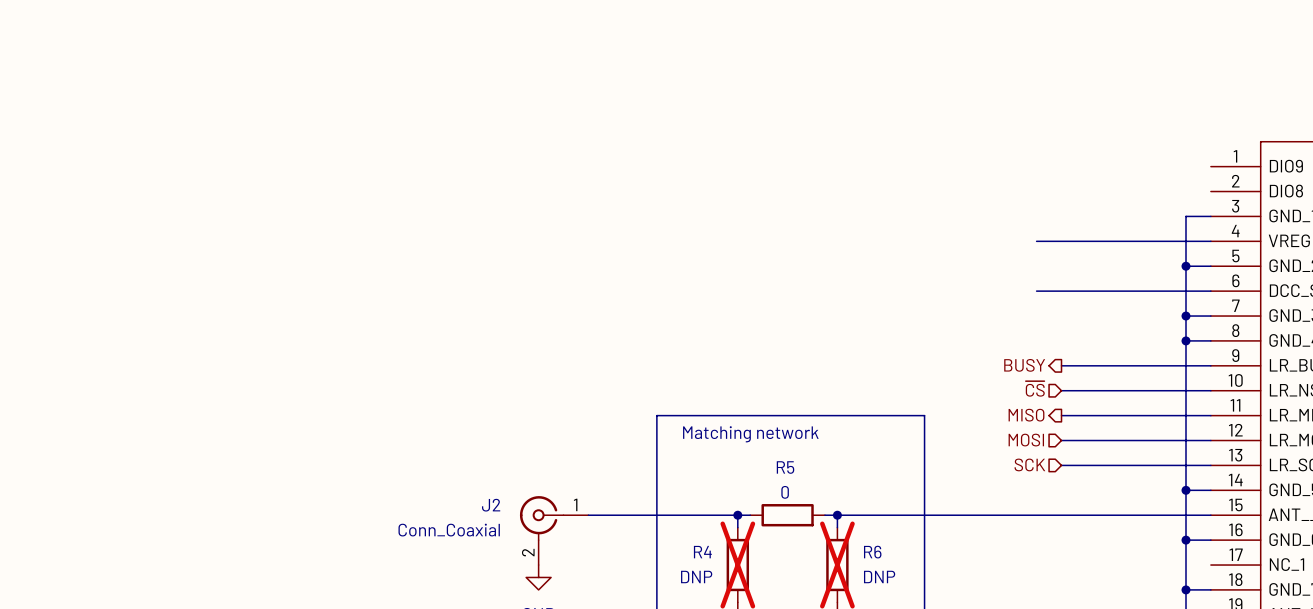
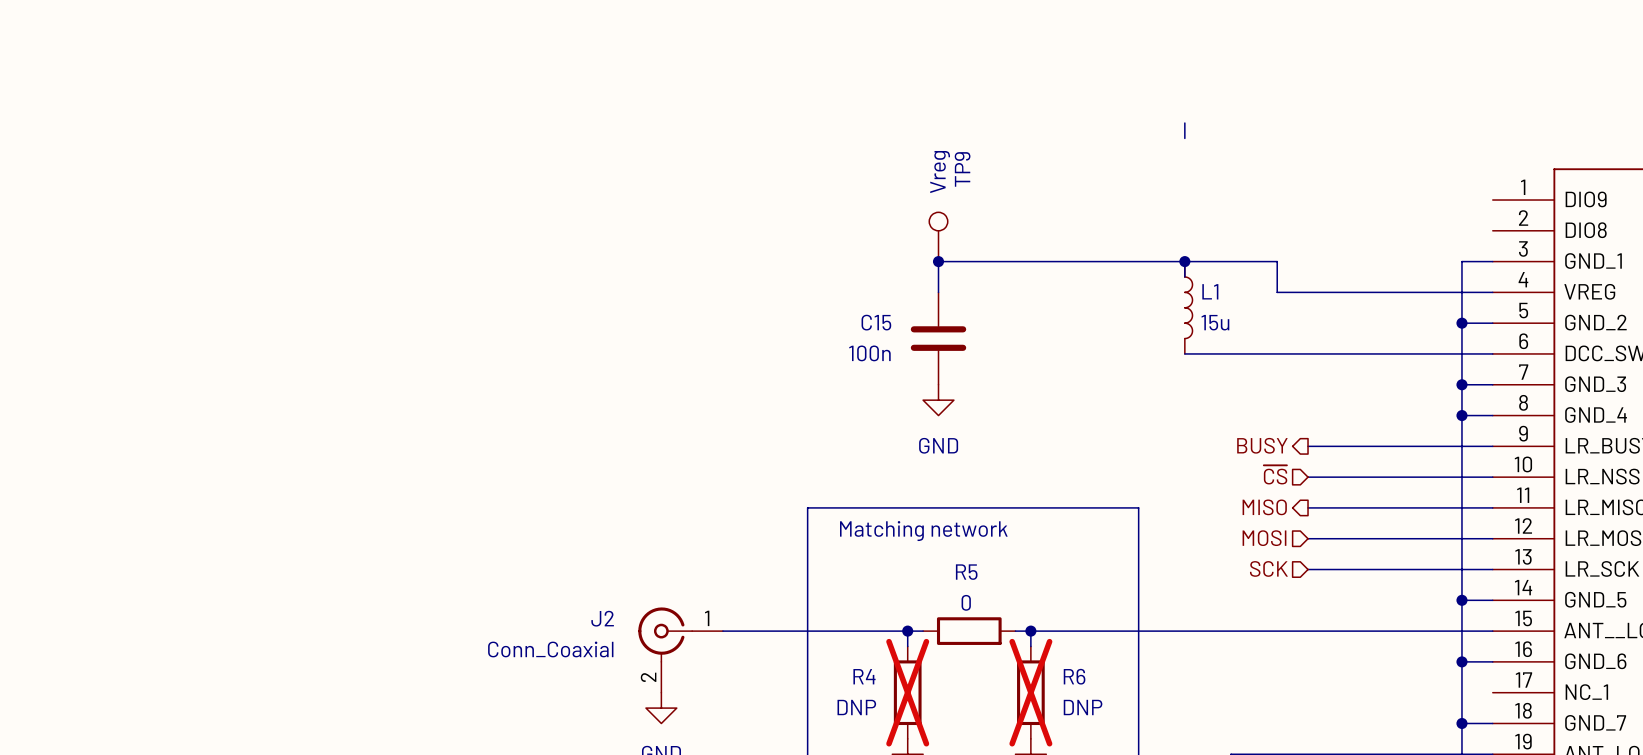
wire: none -> (1184, 123) (1184, 138)
TP9: none -> Vreg (938, 236)
junction: none -> (938, 261)
wire: none -> (1184, 261) (1184, 276)
junction: none -> (1184, 261)
wire: none -> (938, 292) (938, 261) (1277, 261) (1277, 292)
L1: none -> 15u (1188, 307)
C15: none -> 100n (938, 338)
wire: none -> (1184, 353) (1277, 353)
power symbol: none -> GND (938, 400)

